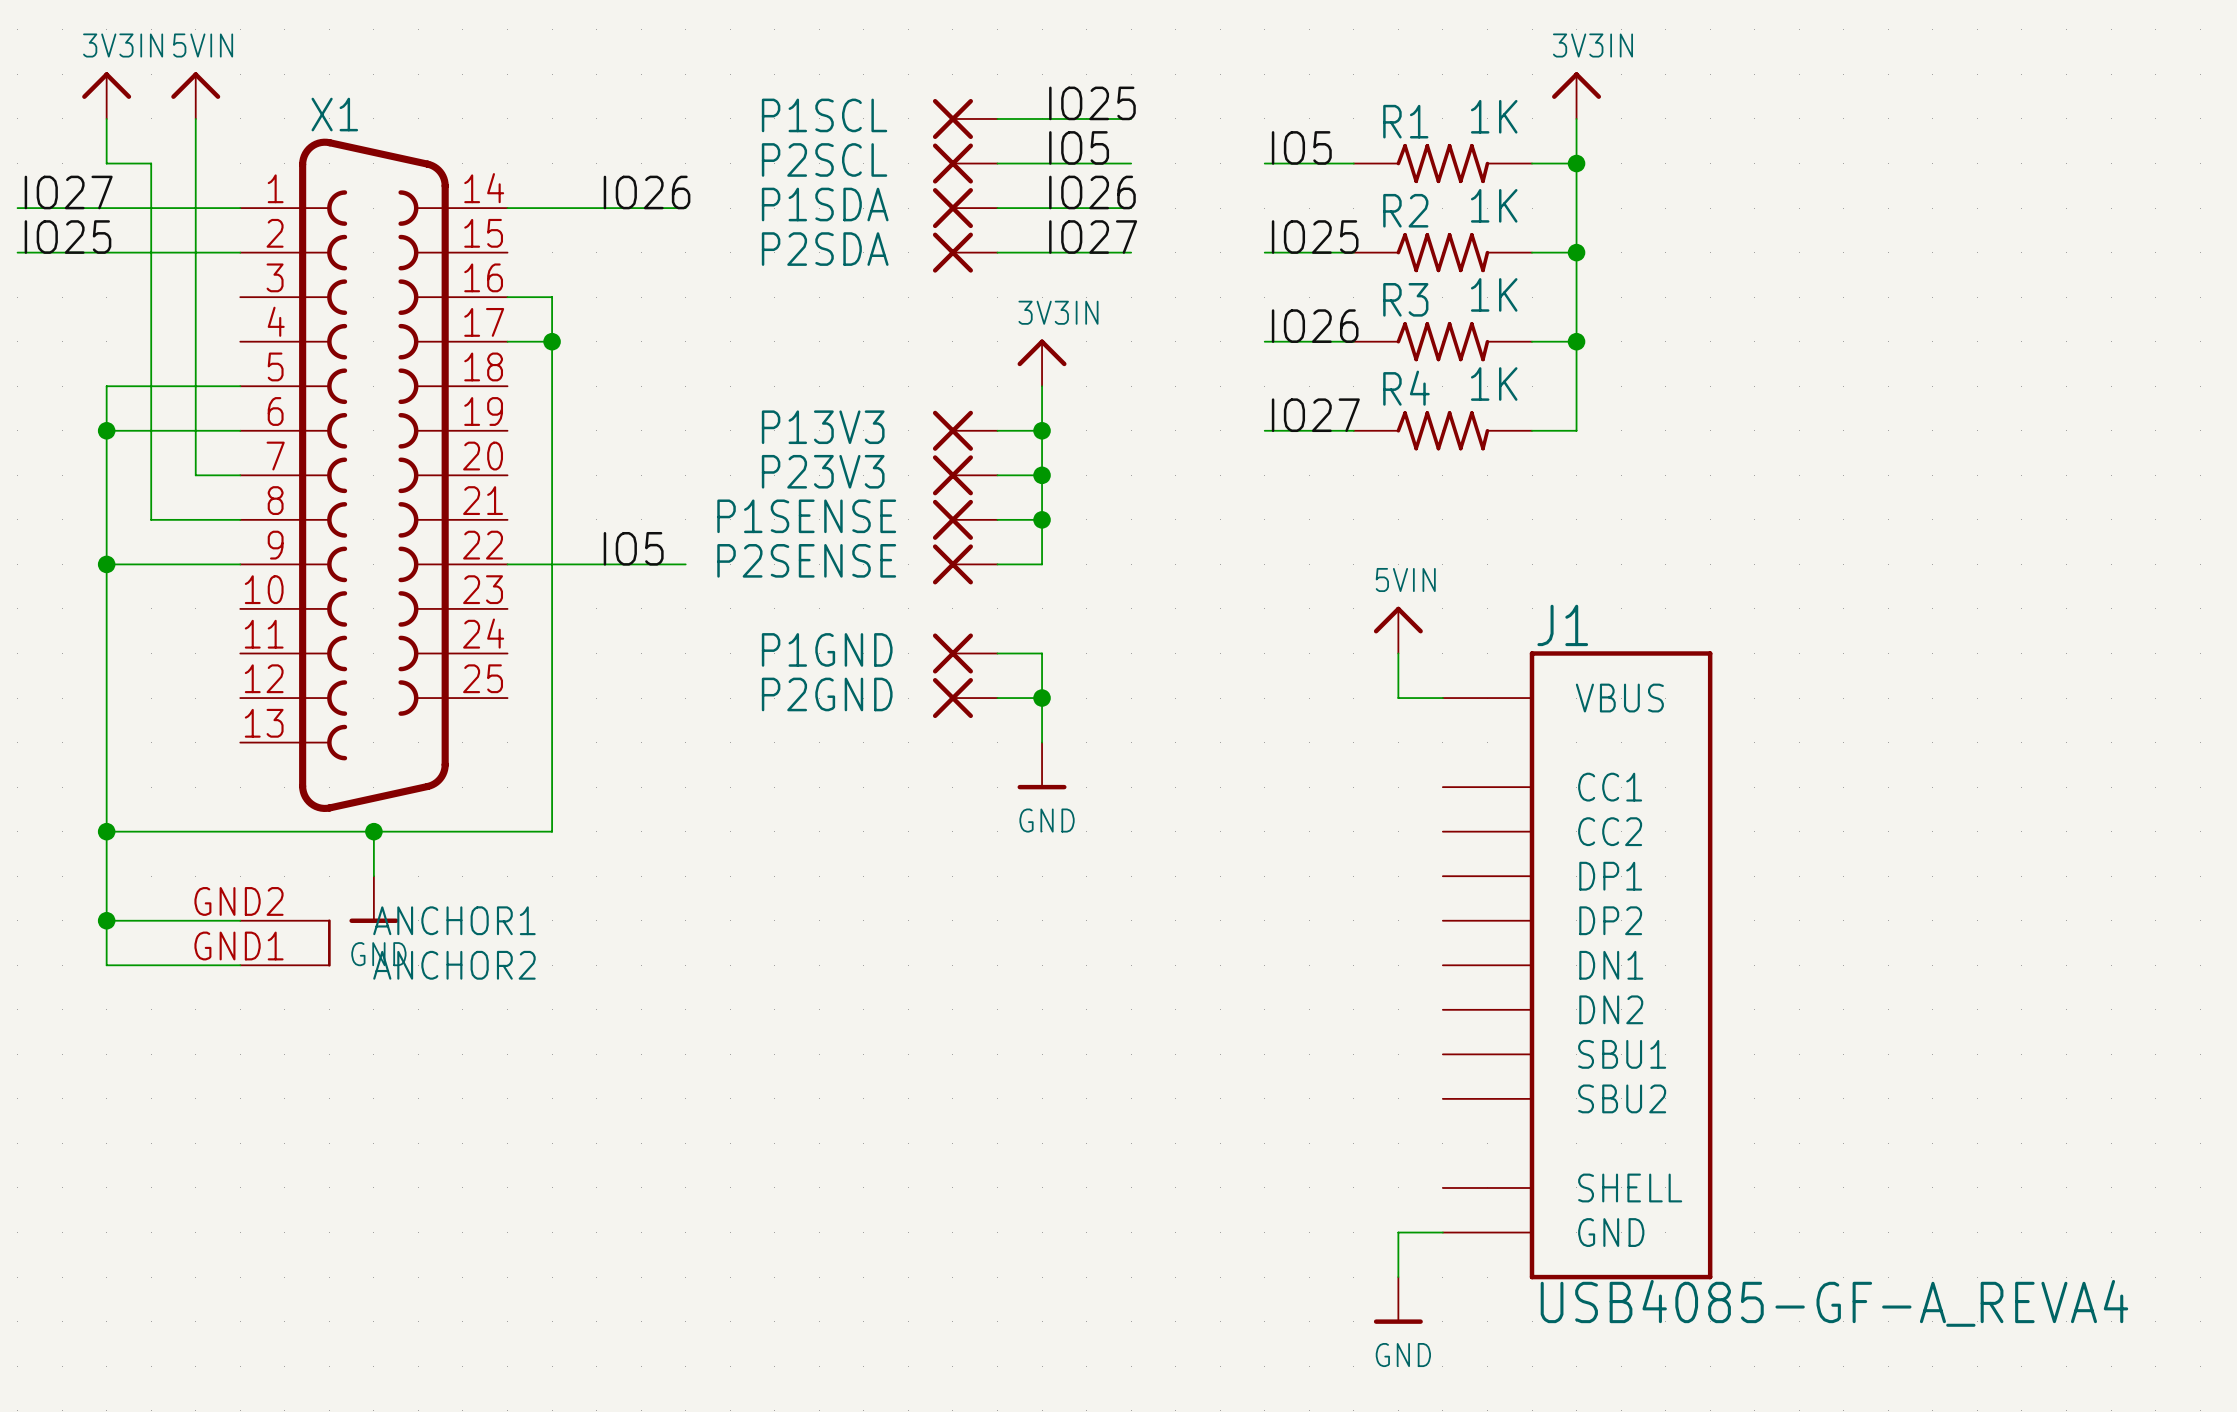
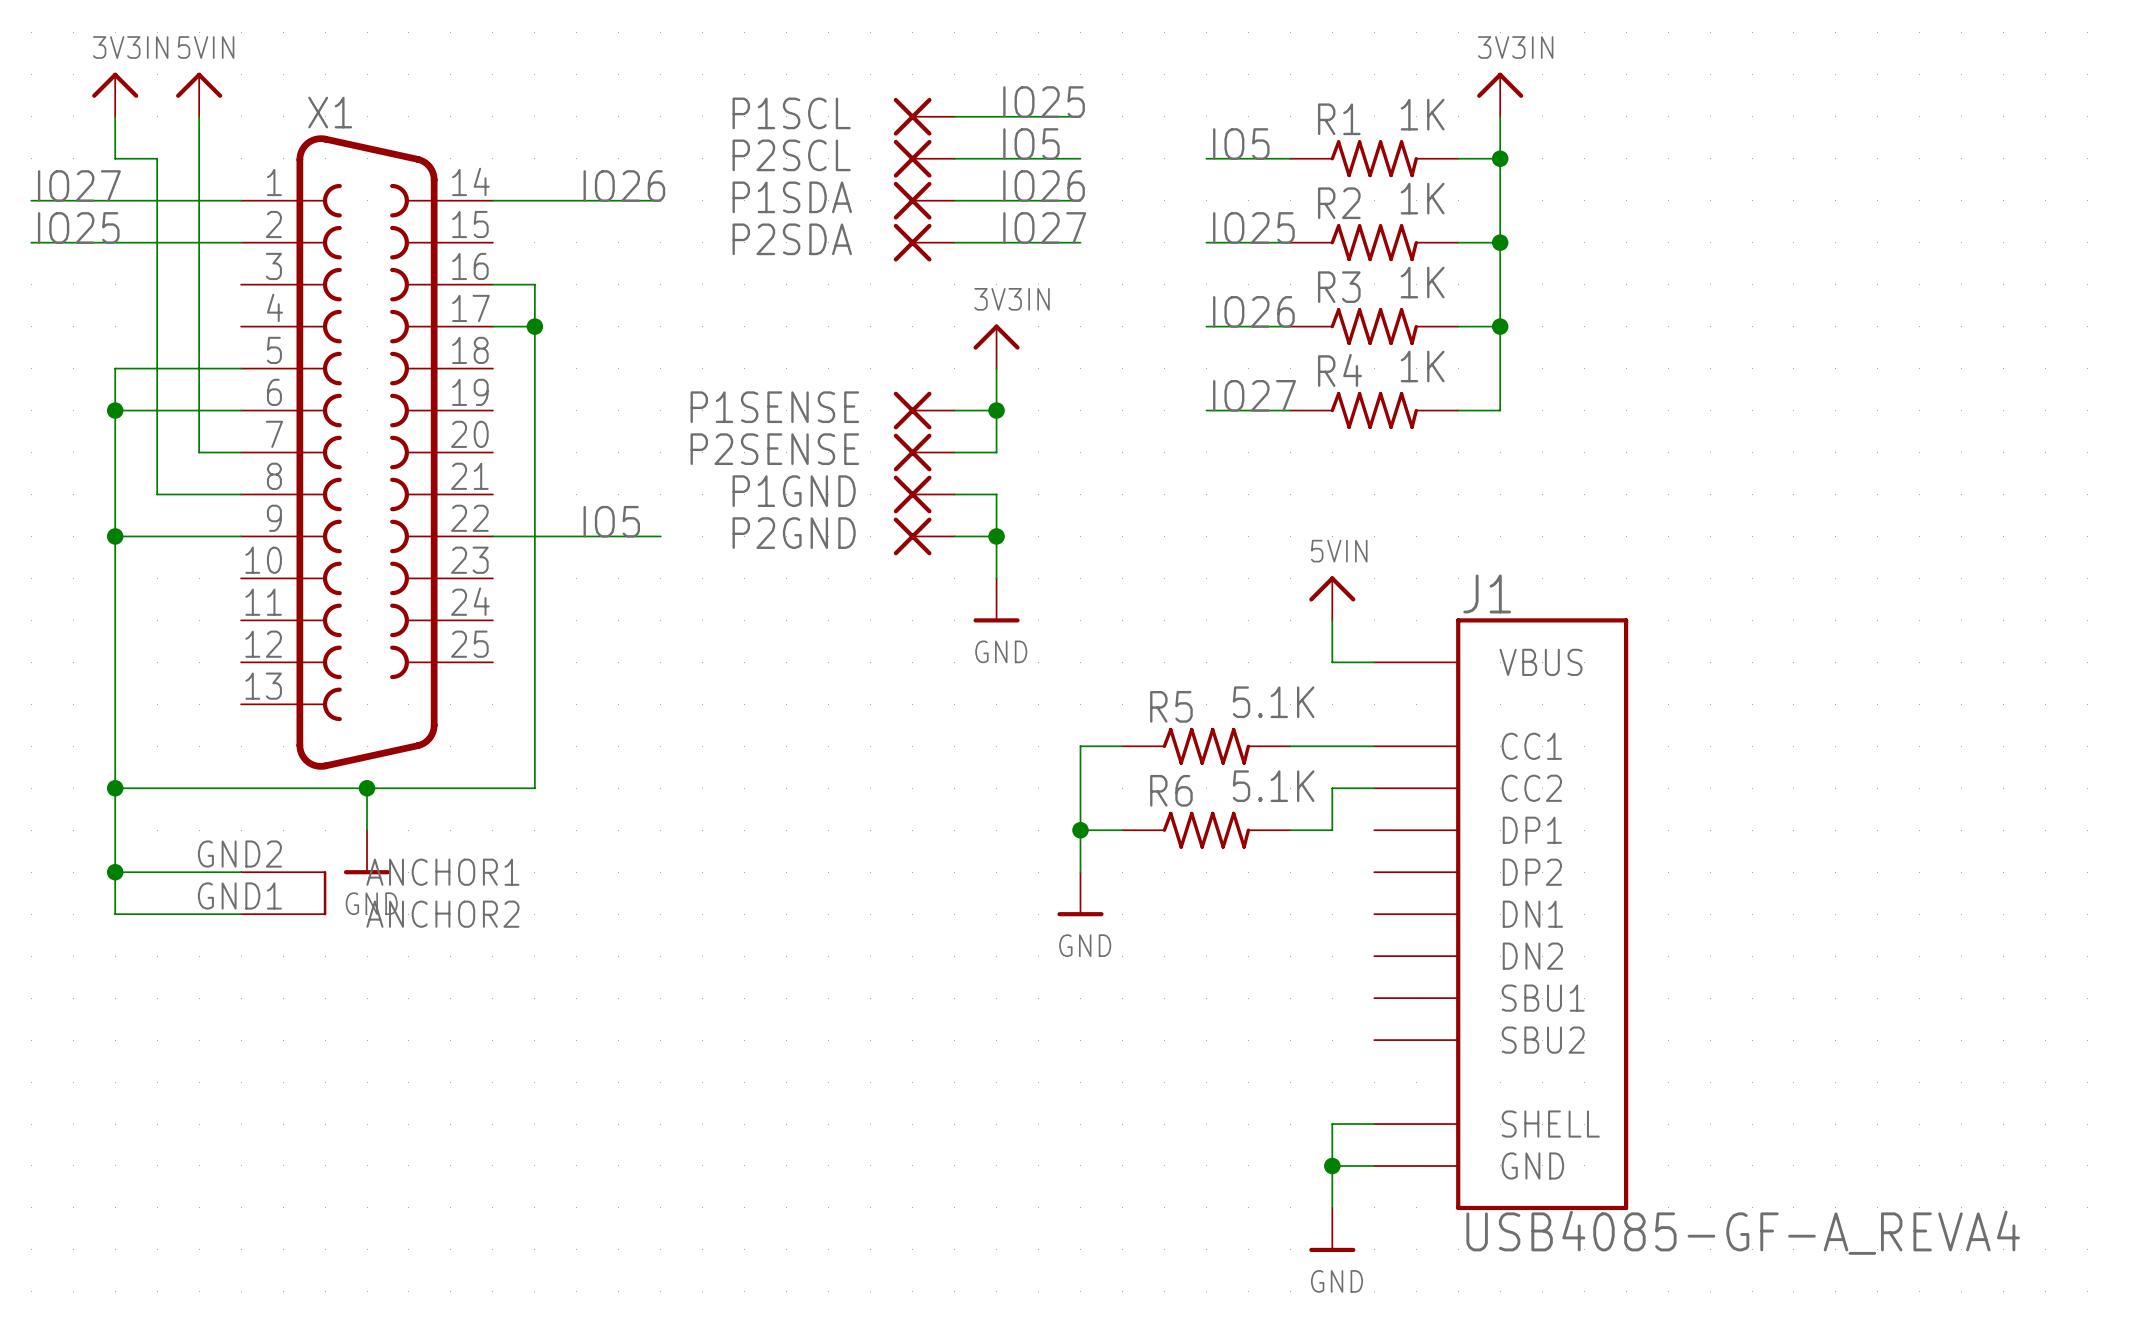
P13V3 name: P13V3 (823, 427) -> P1SENSE (774, 407)
P23V3 name: P23V3 (823, 471) -> P2SENSE (774, 449)
wire: (1042, 475) (1042, 519) -> (996, 536) (996, 578)
junction: (1042, 475) -> none
P1SENSE name: P1SENSE (806, 516) -> P1GND (794, 491)
junction: (1042, 519) -> none
P2SENSE name: P2SENSE (806, 560) -> P2GND (794, 533)
junction: none -> (996, 536)
power symbol: none -> GND (996, 600)
P1GND: (965, 653) -> none
wire: (997, 653) (1042, 653) (1042, 742) -> none
P2GND: (965, 698) -> none
wire: (997, 698) (1042, 698) -> (1080, 830) (1122, 830)
junction: (1042, 698) -> none
power symbol: GND (1042, 765) -> none
wire: none -> (1122, 746) (1080, 746) (1080, 872)
R5: none -> 5.1K (1206, 746)
wire: none -> (1290, 746) (1374, 746)
wire: none -> (1374, 788) (1332, 788) (1332, 830) (1290, 830)
junction: none -> (1080, 830)
R6: none -> 5.1K (1206, 830)
power symbol: none -> GND (1080, 894)
wire: none -> (1374, 1124) (1332, 1124) (1332, 1165)
junction: none -> (1332, 1165)

